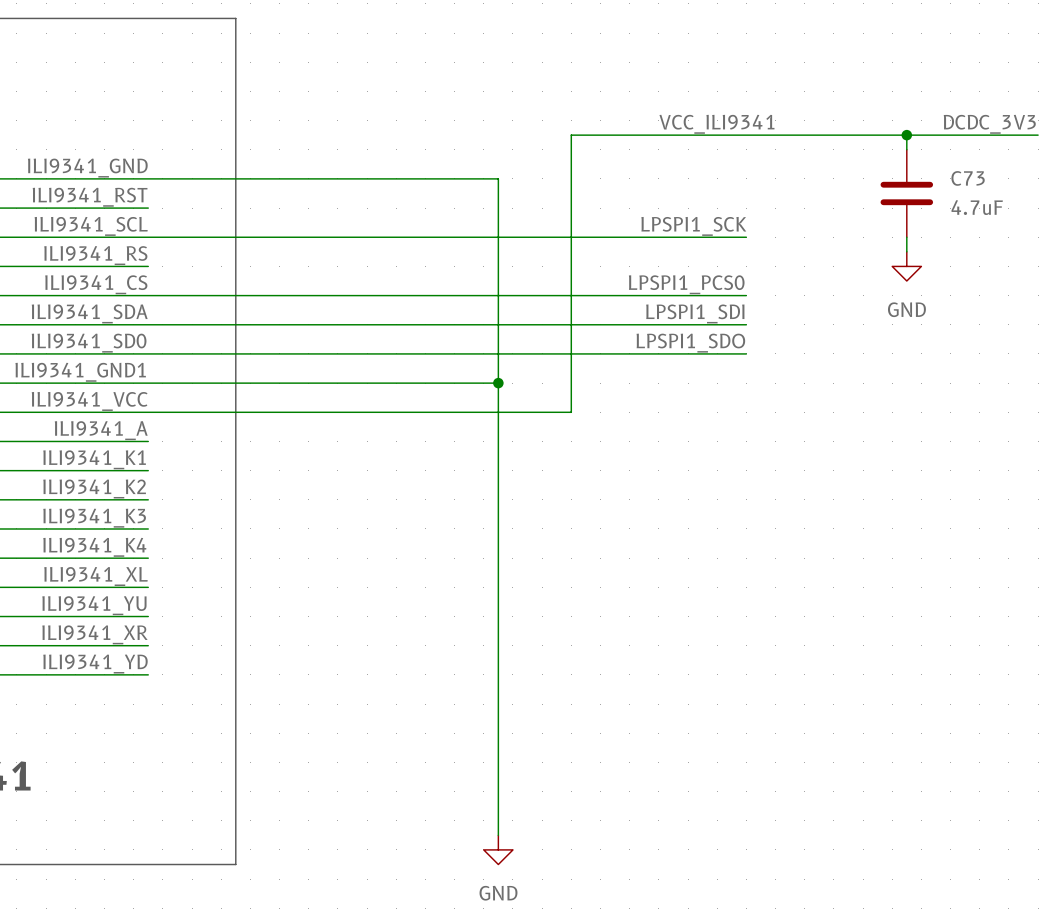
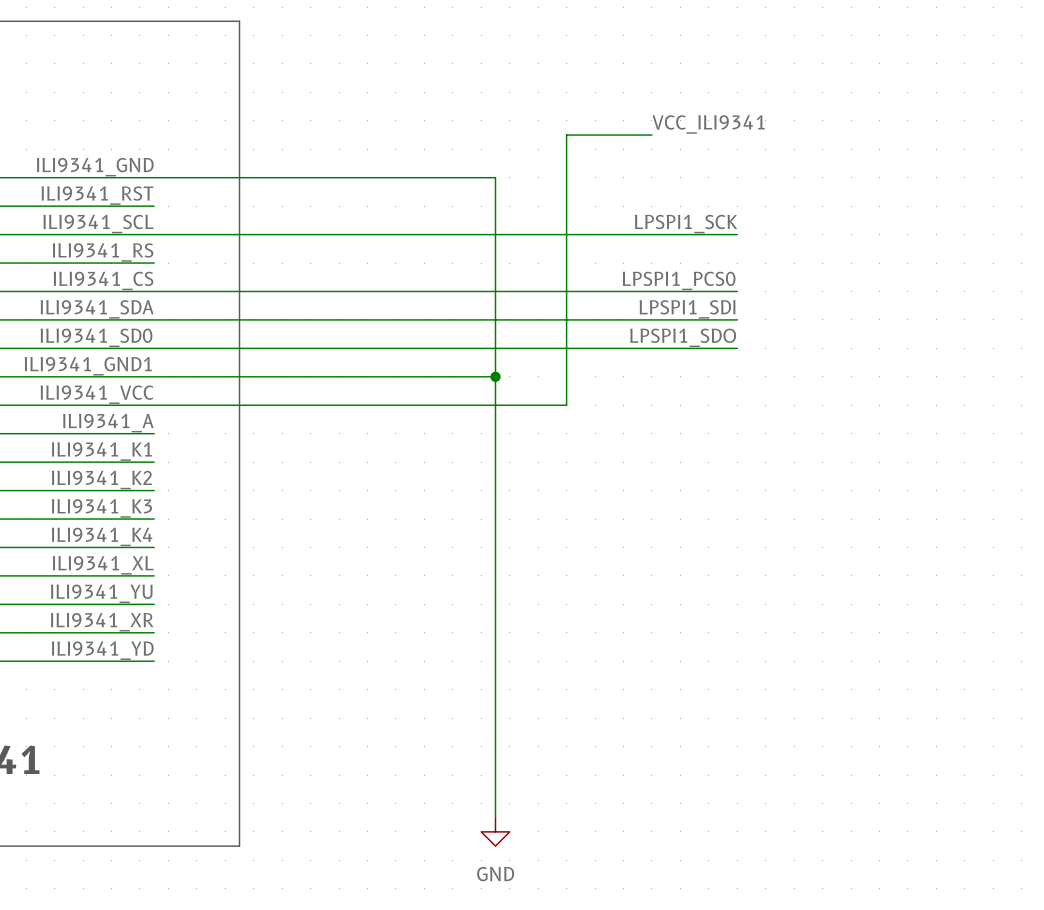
label: DCDC_3V3 (989, 124) -> none
wire: (658, 135) (1038, 135) -> none
wire: (906, 135) (906, 149) -> none
junction: (906, 135) -> none
C73: 4.7uF (906, 193) -> none
wire: (906, 237) (906, 251) -> none
power symbol: GND (906, 266) -> none

